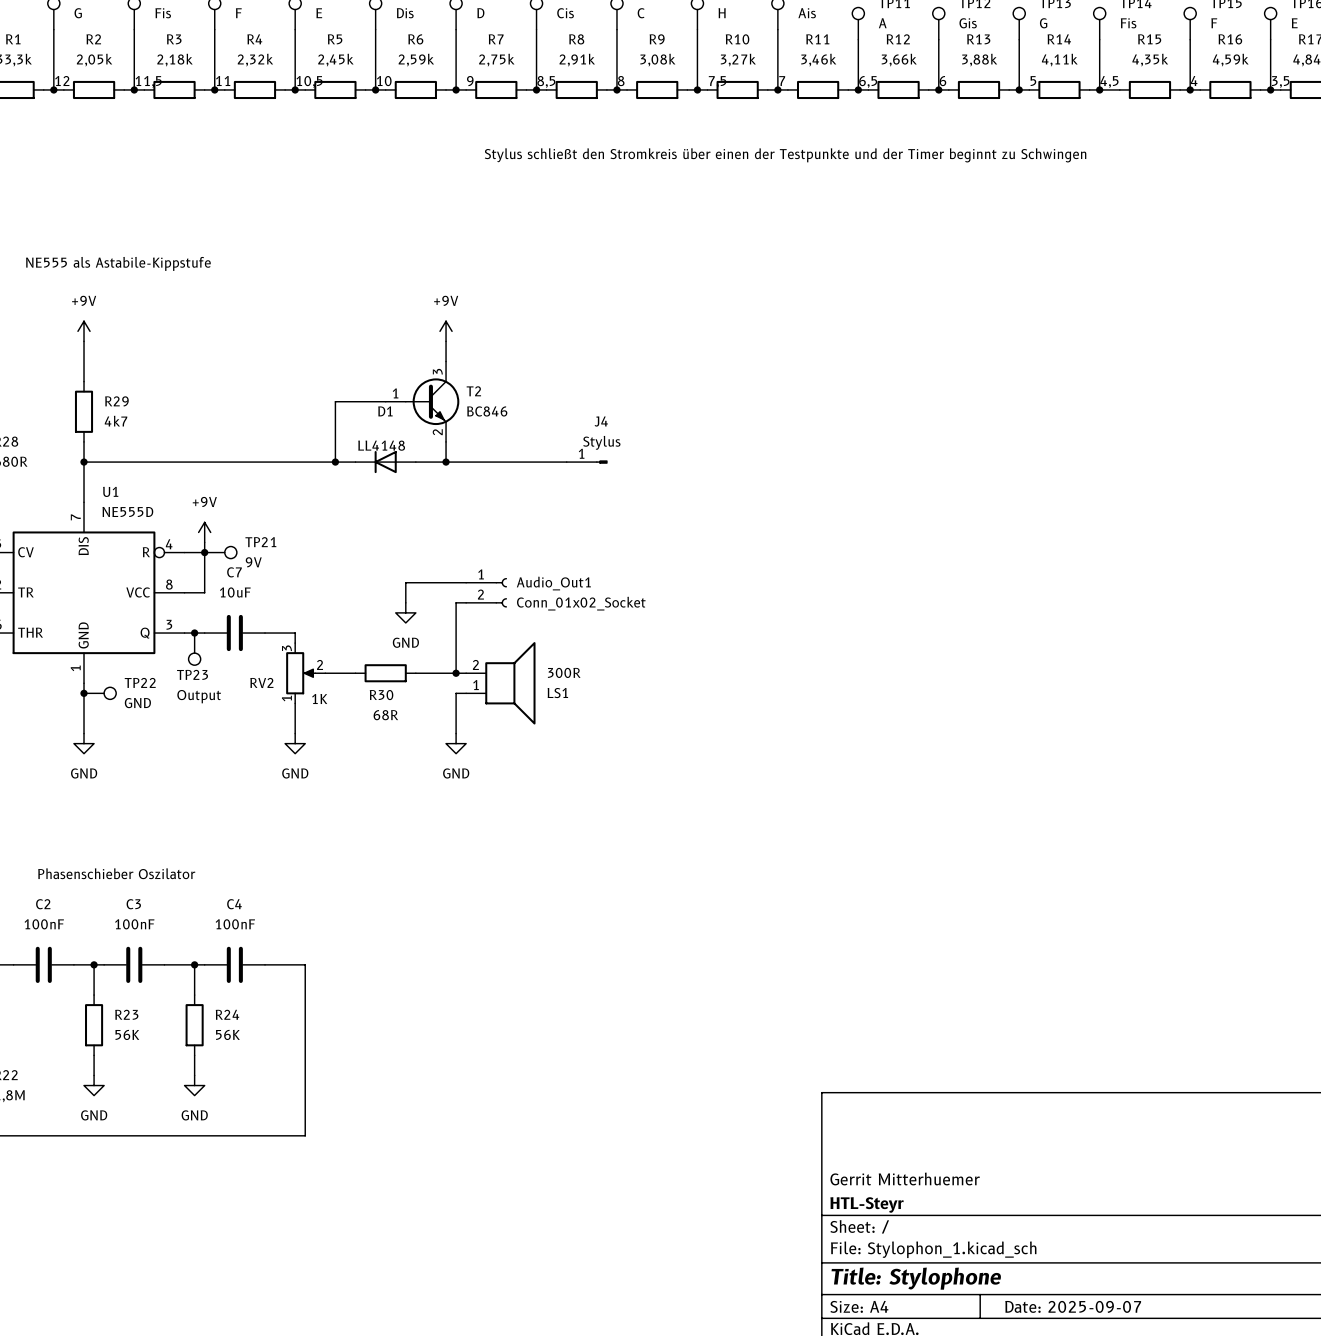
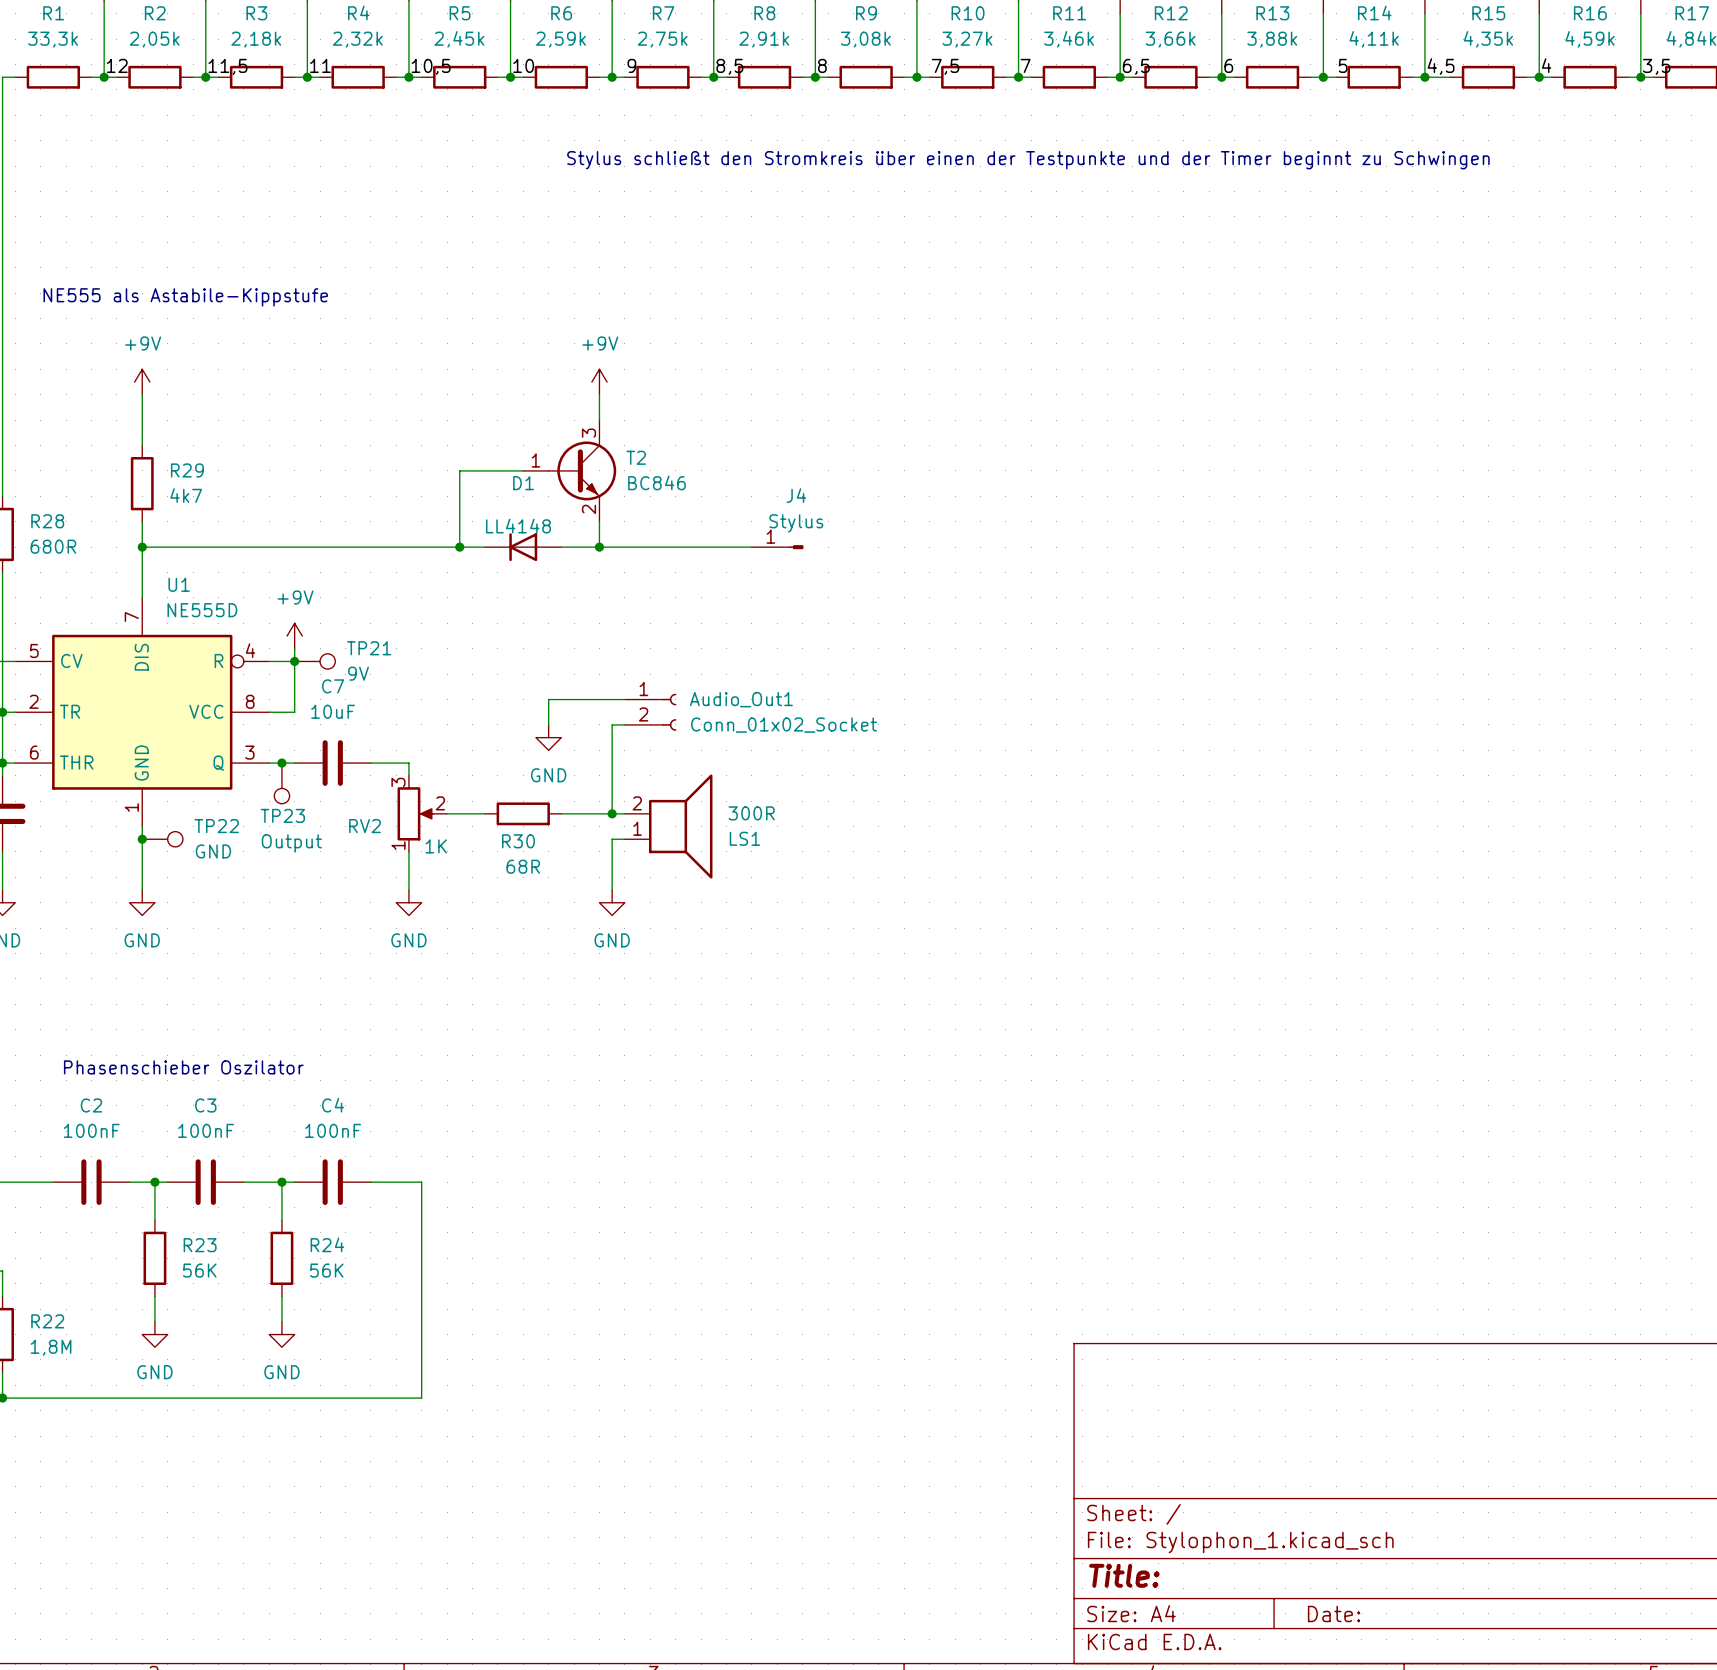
title block: Gerrit Mitterhuemer (905, 1179) -> none
title block: HTL-Steyr (867, 1204) -> none
title block: Title: Stylophone (916, 1278) -> Title: (1124, 1575)
title block: Date: 2025-09-07 (1073, 1306) -> Date: (1333, 1613)

